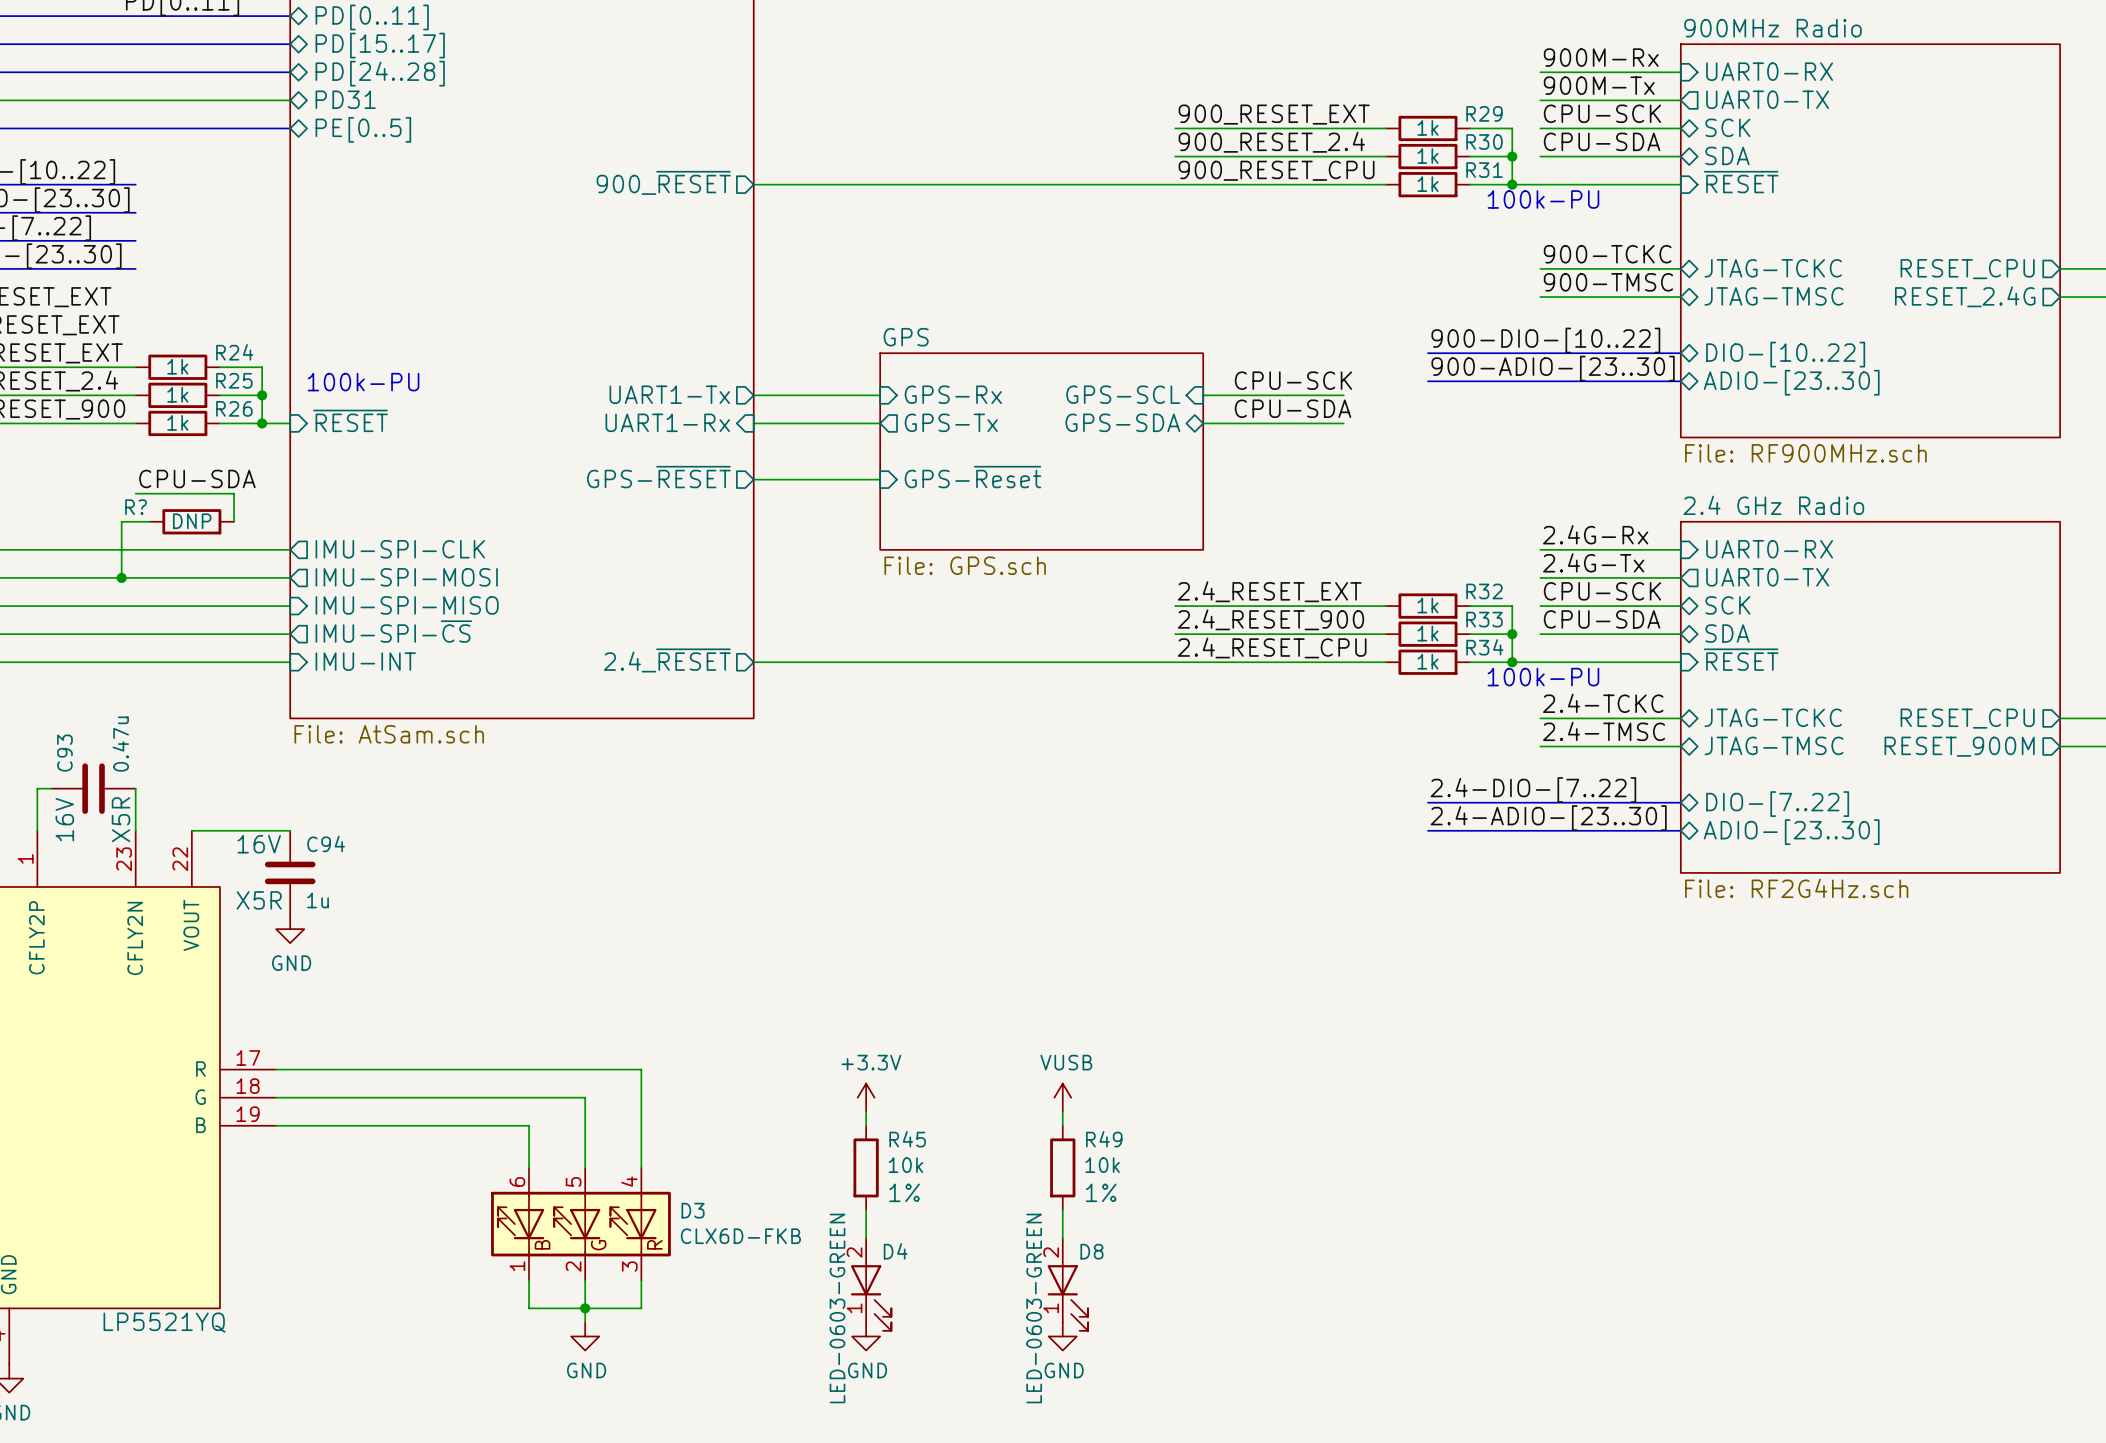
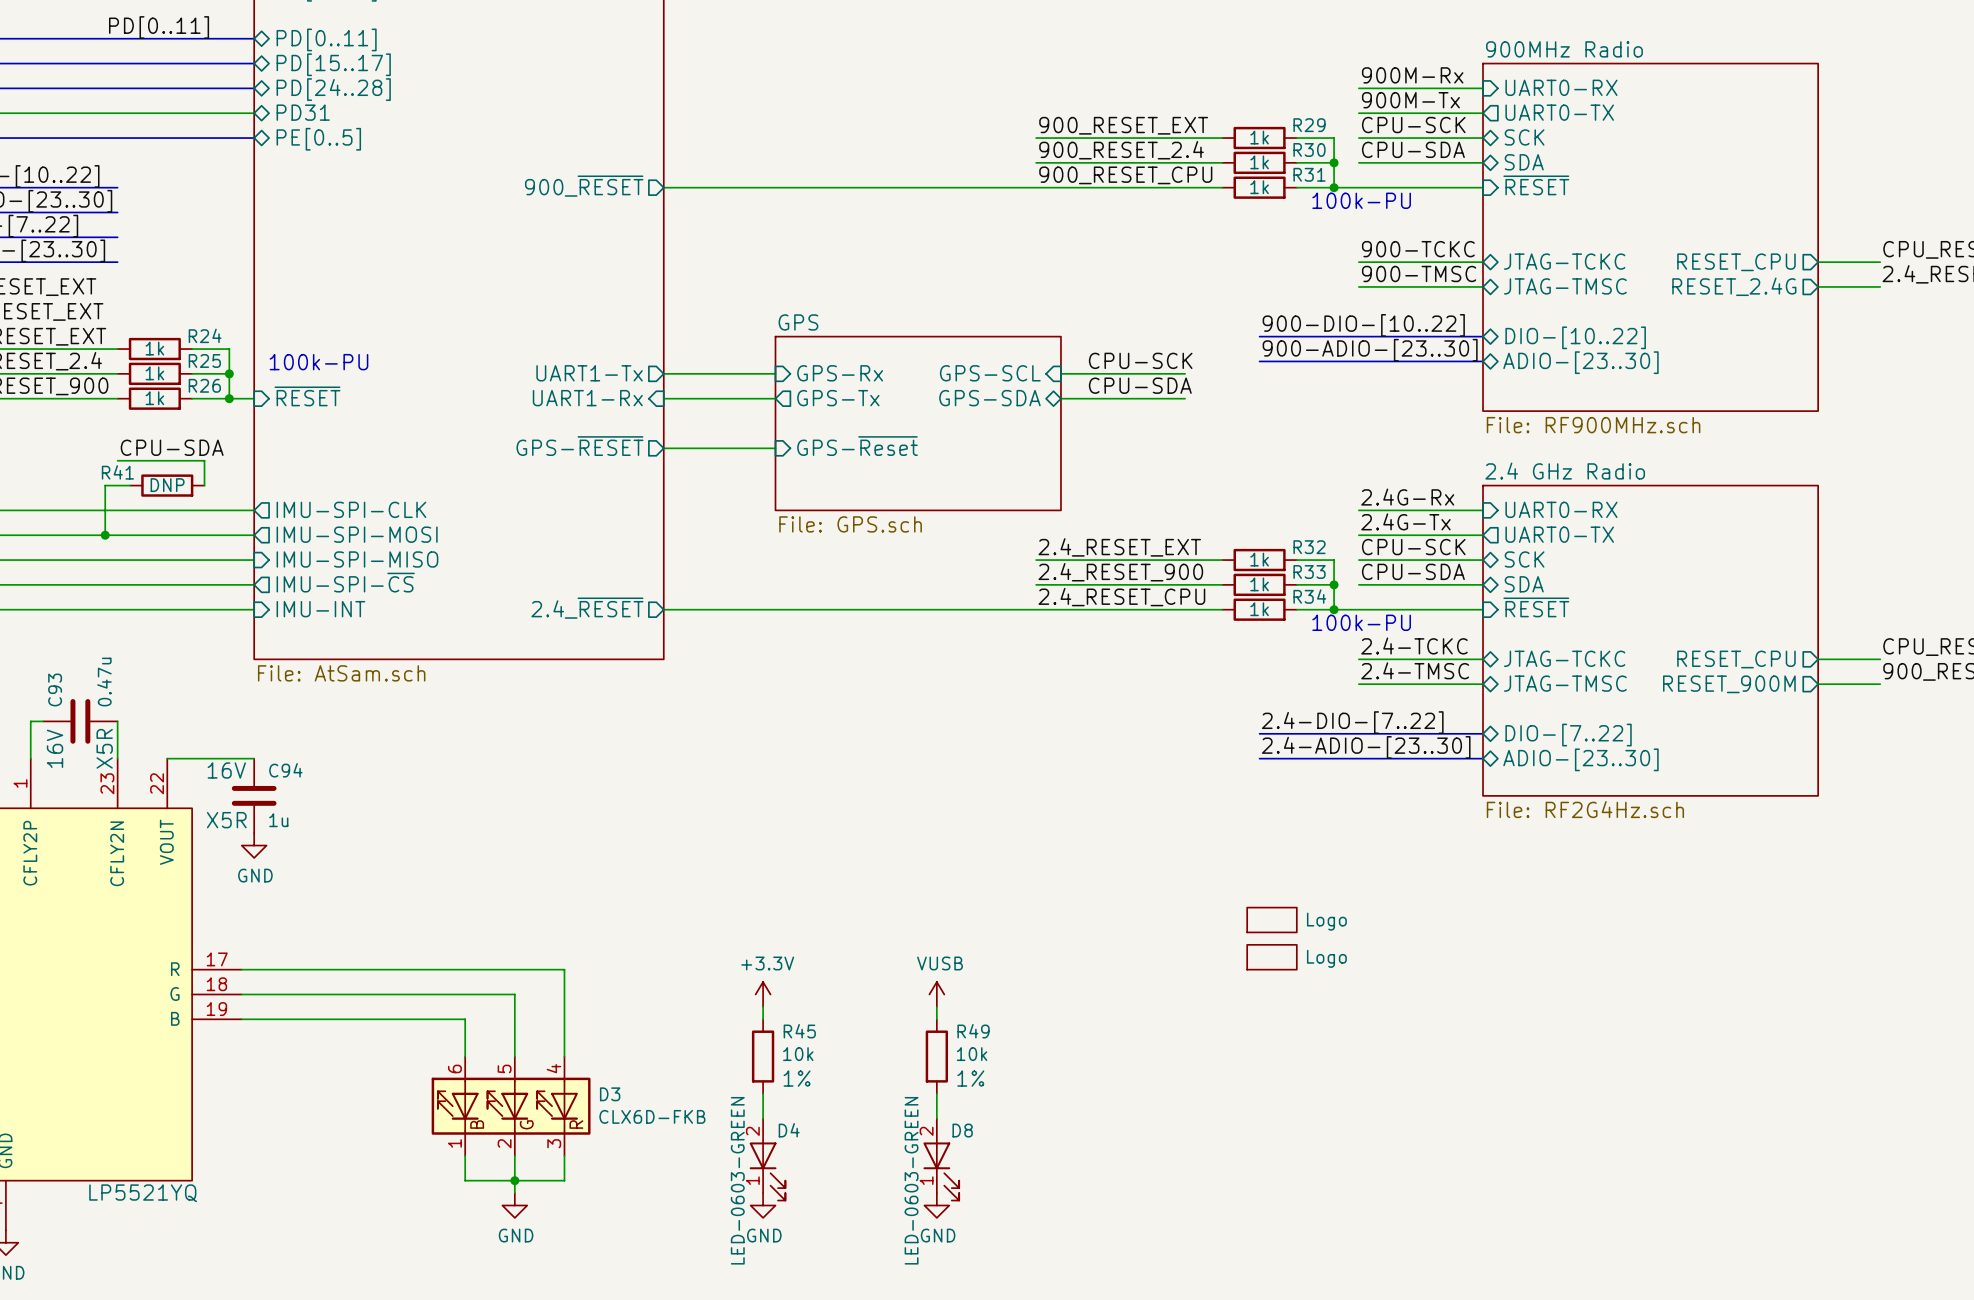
R? name: R? (136, 507) -> R41 (117, 472)
part: none -> Logo (1271, 920)
part: none -> Logo (1271, 957)

